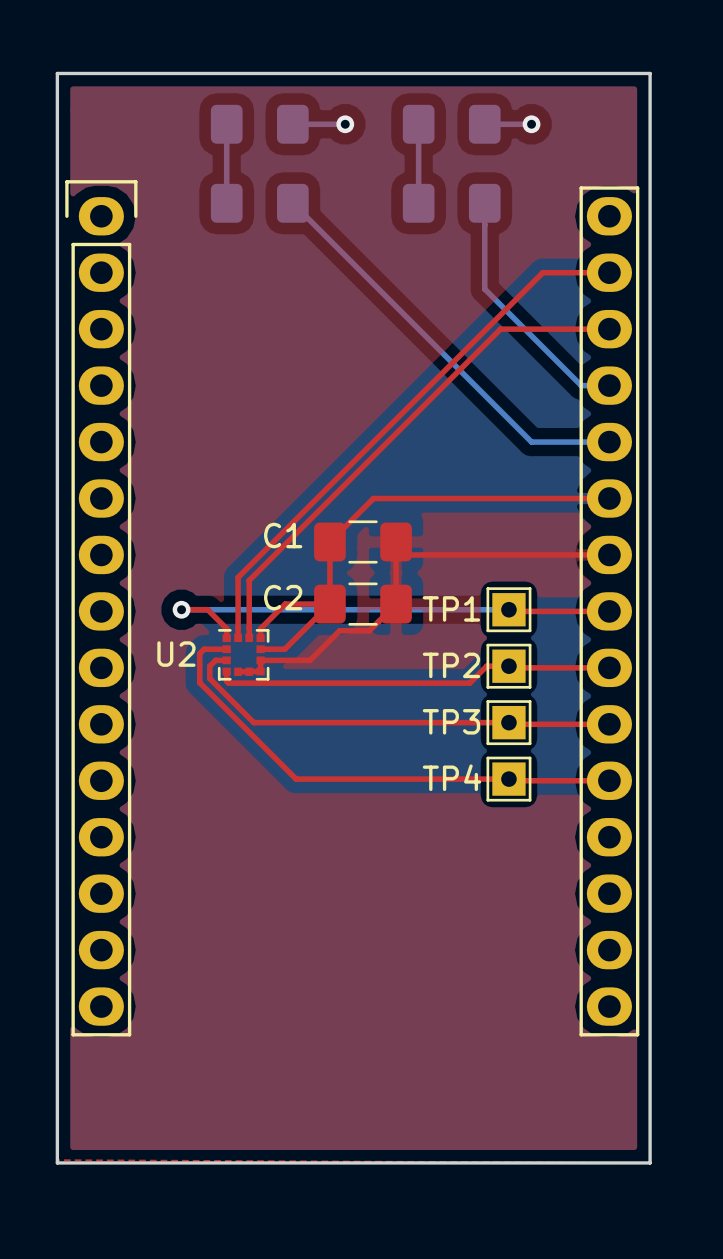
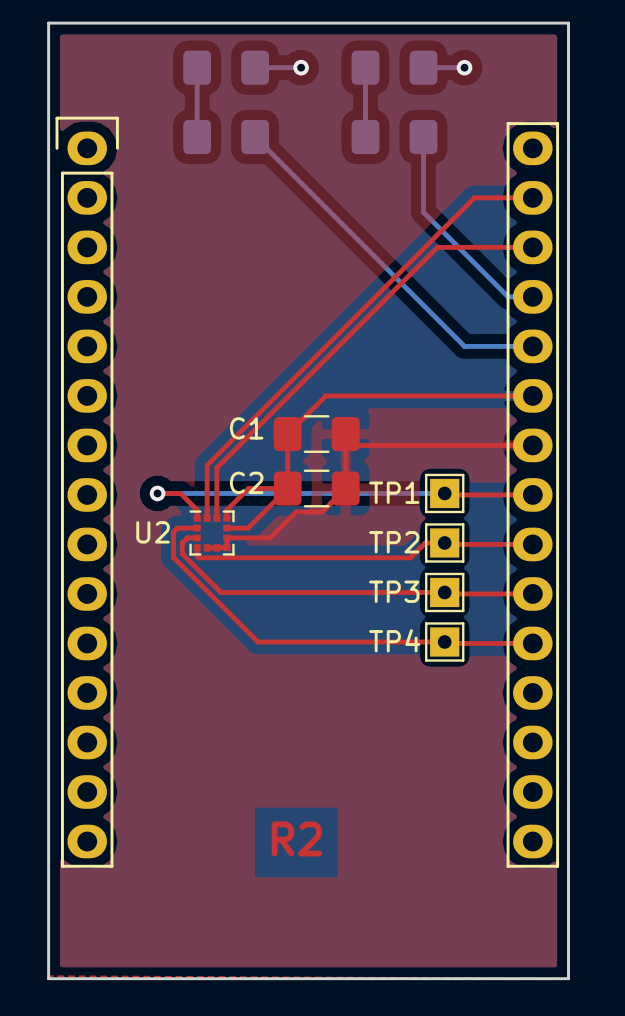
text: none -> R2 (296, 838)

